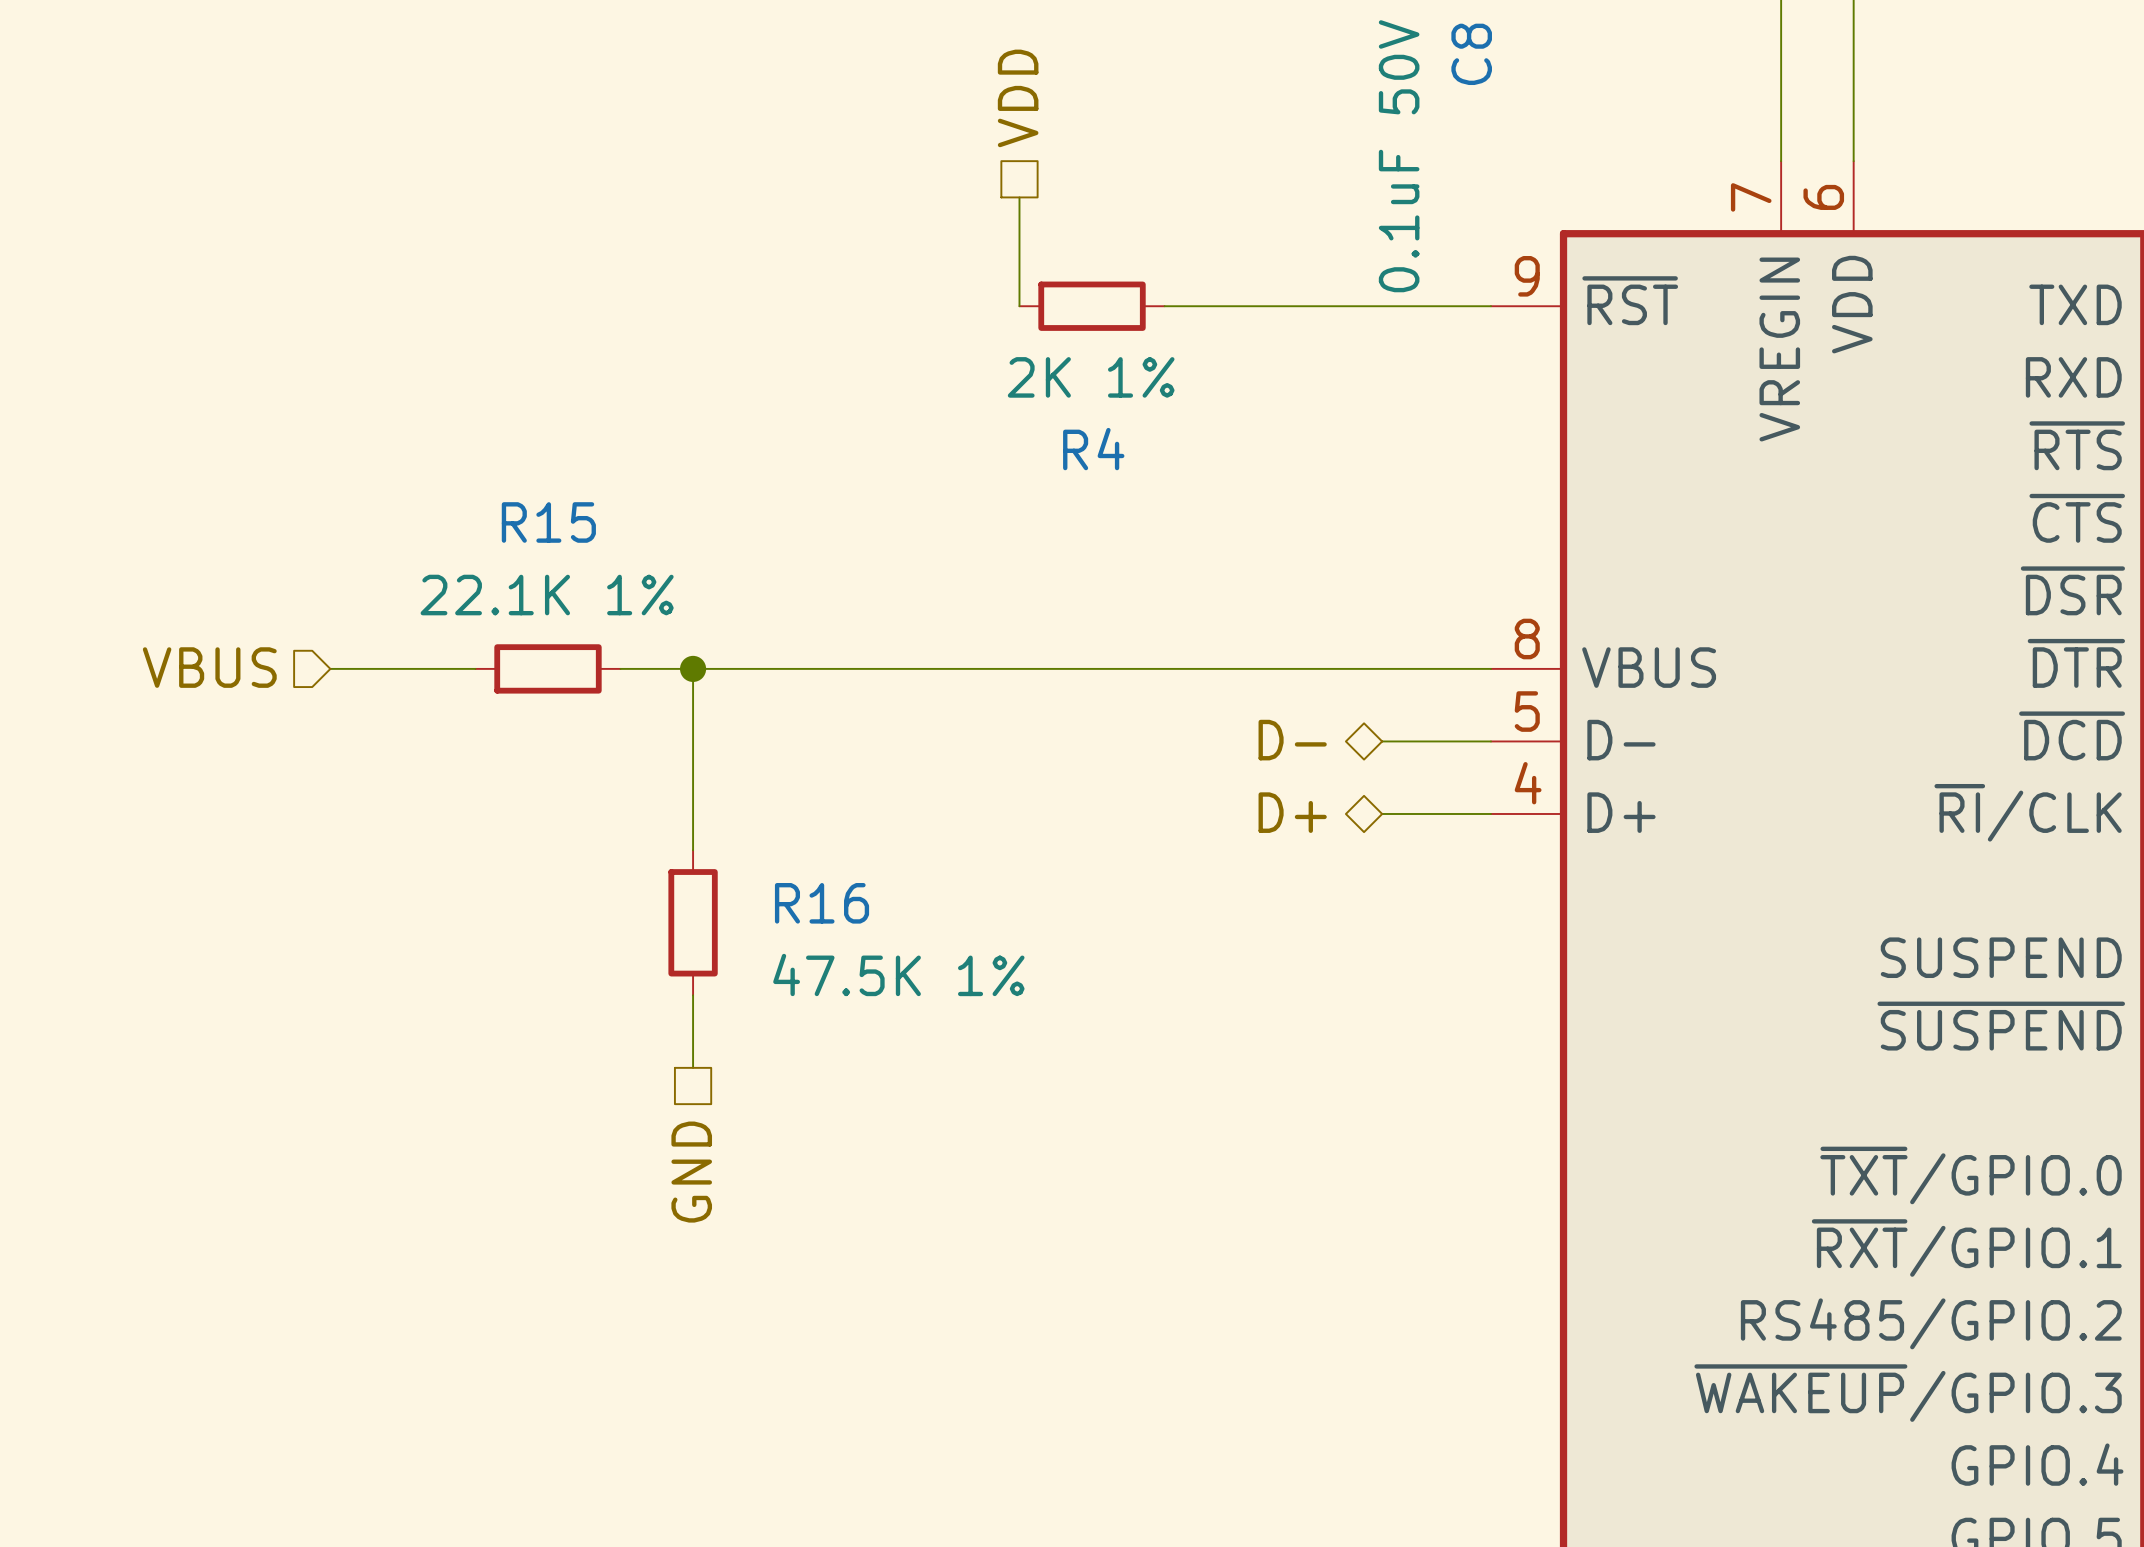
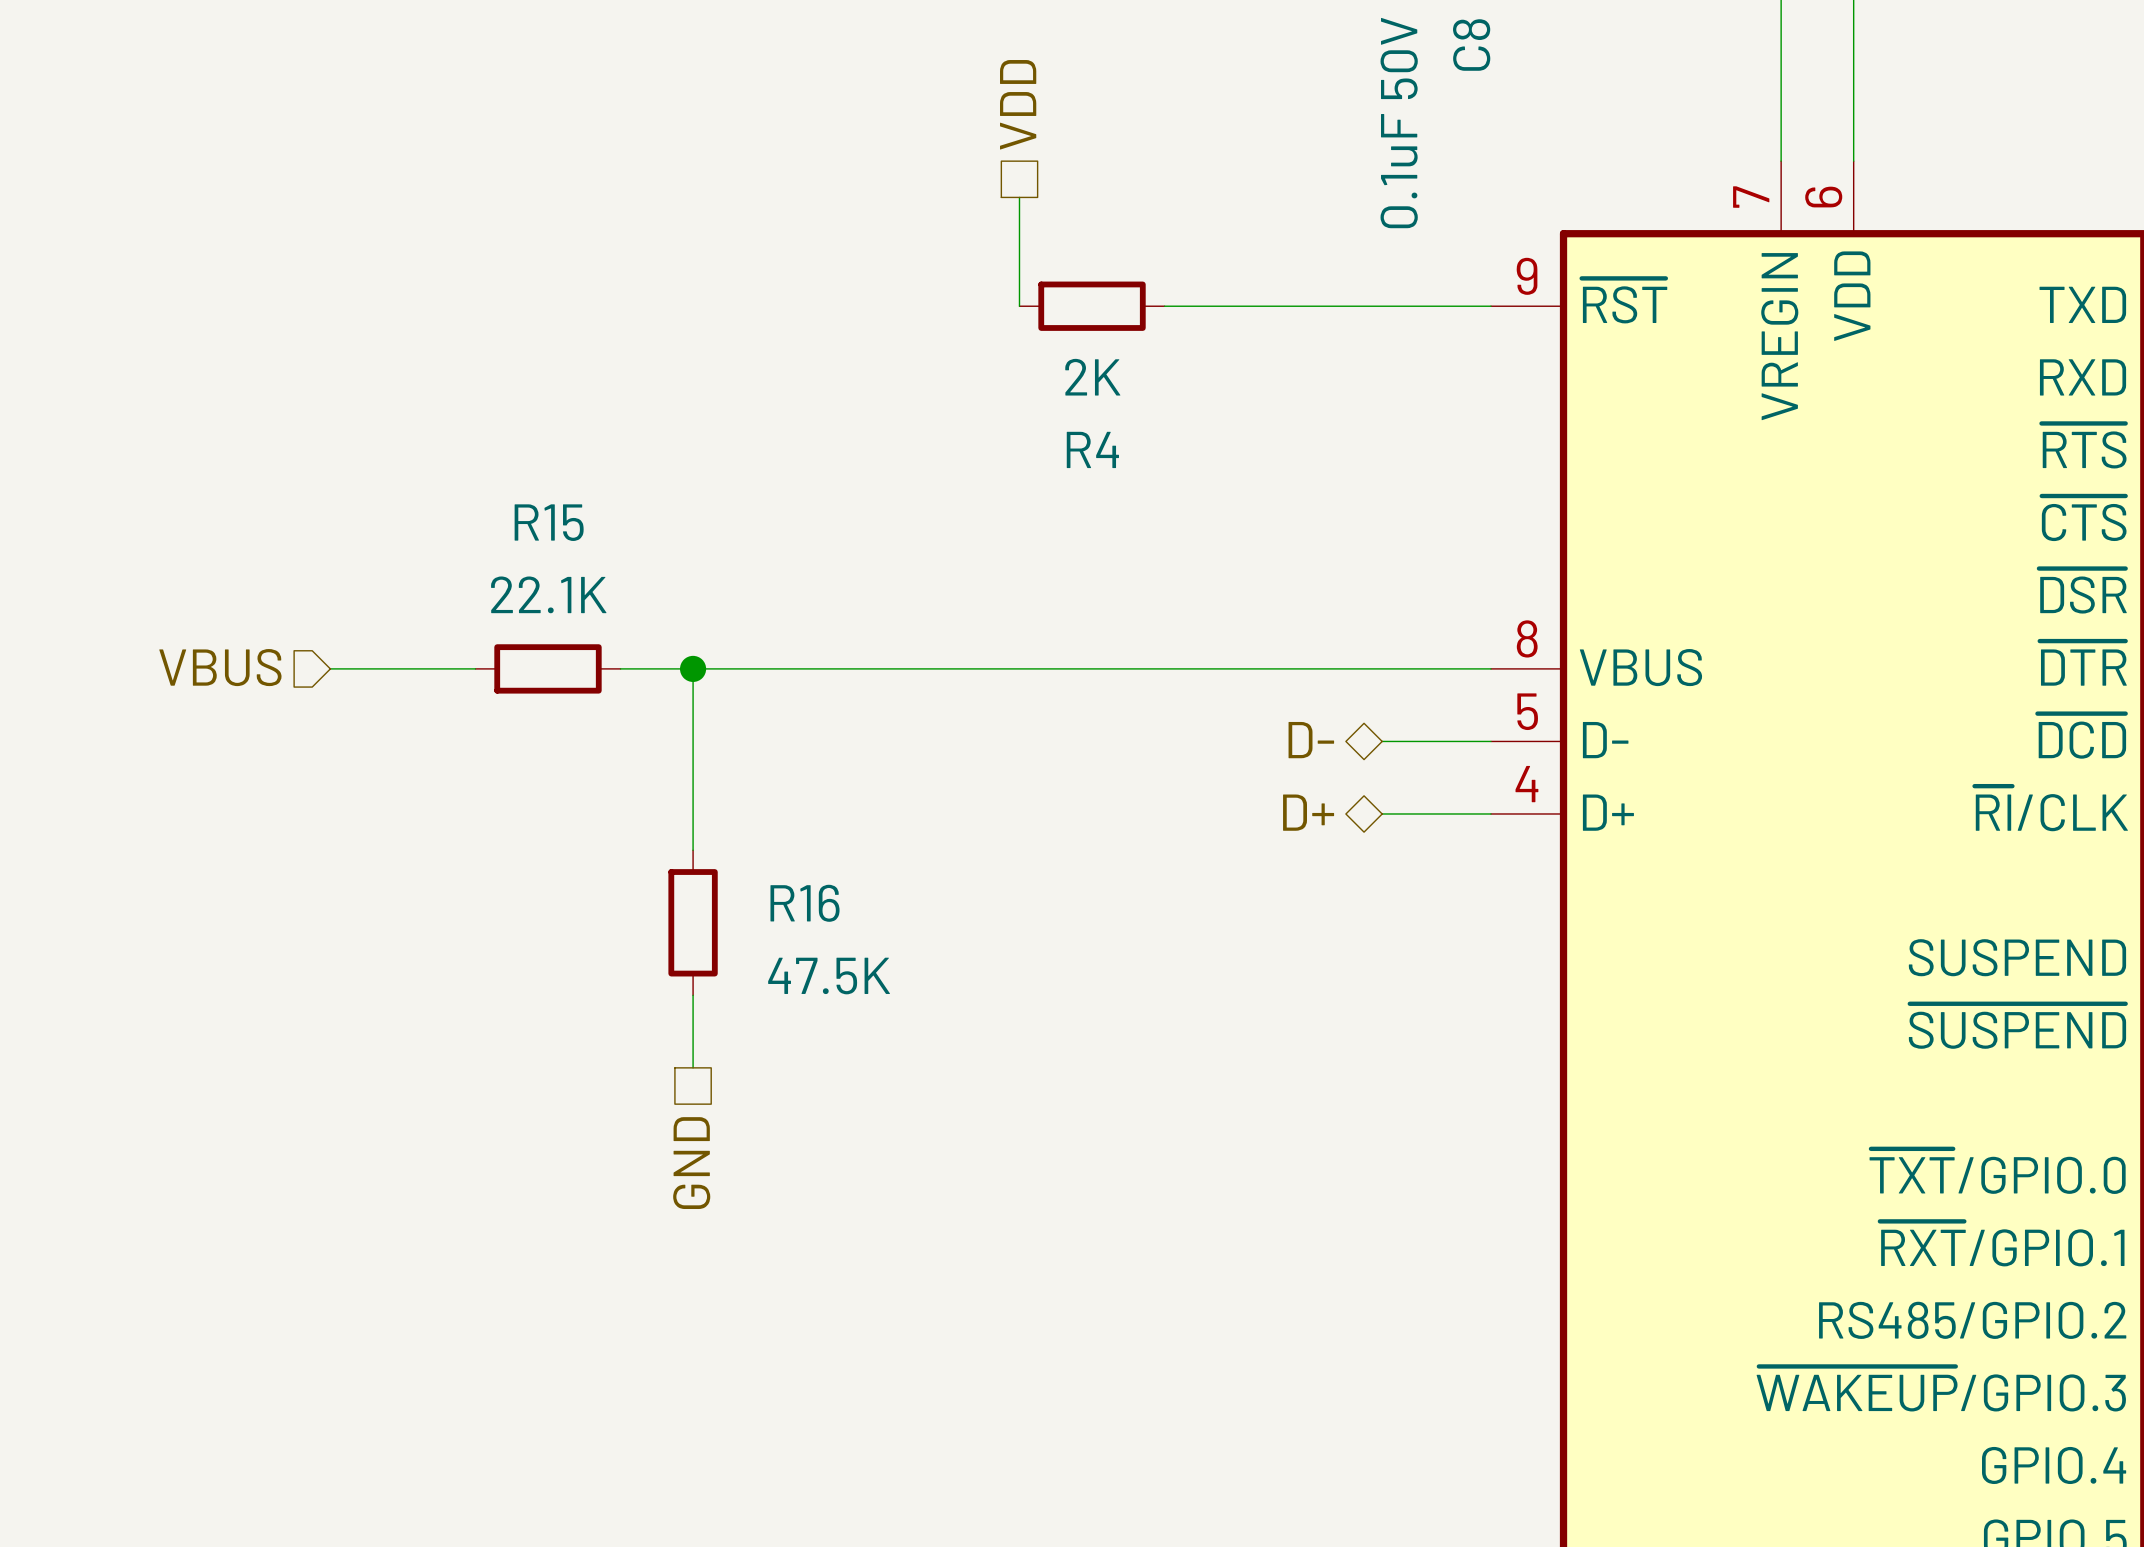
R4 value: 2K 1% (1091, 377) -> 2K (1092, 377)
R15 value: 22.1K 1% (547, 595) -> 22.1K (548, 594)
R16 value: 47.5K 1% (898, 974) -> 47.5K (829, 976)

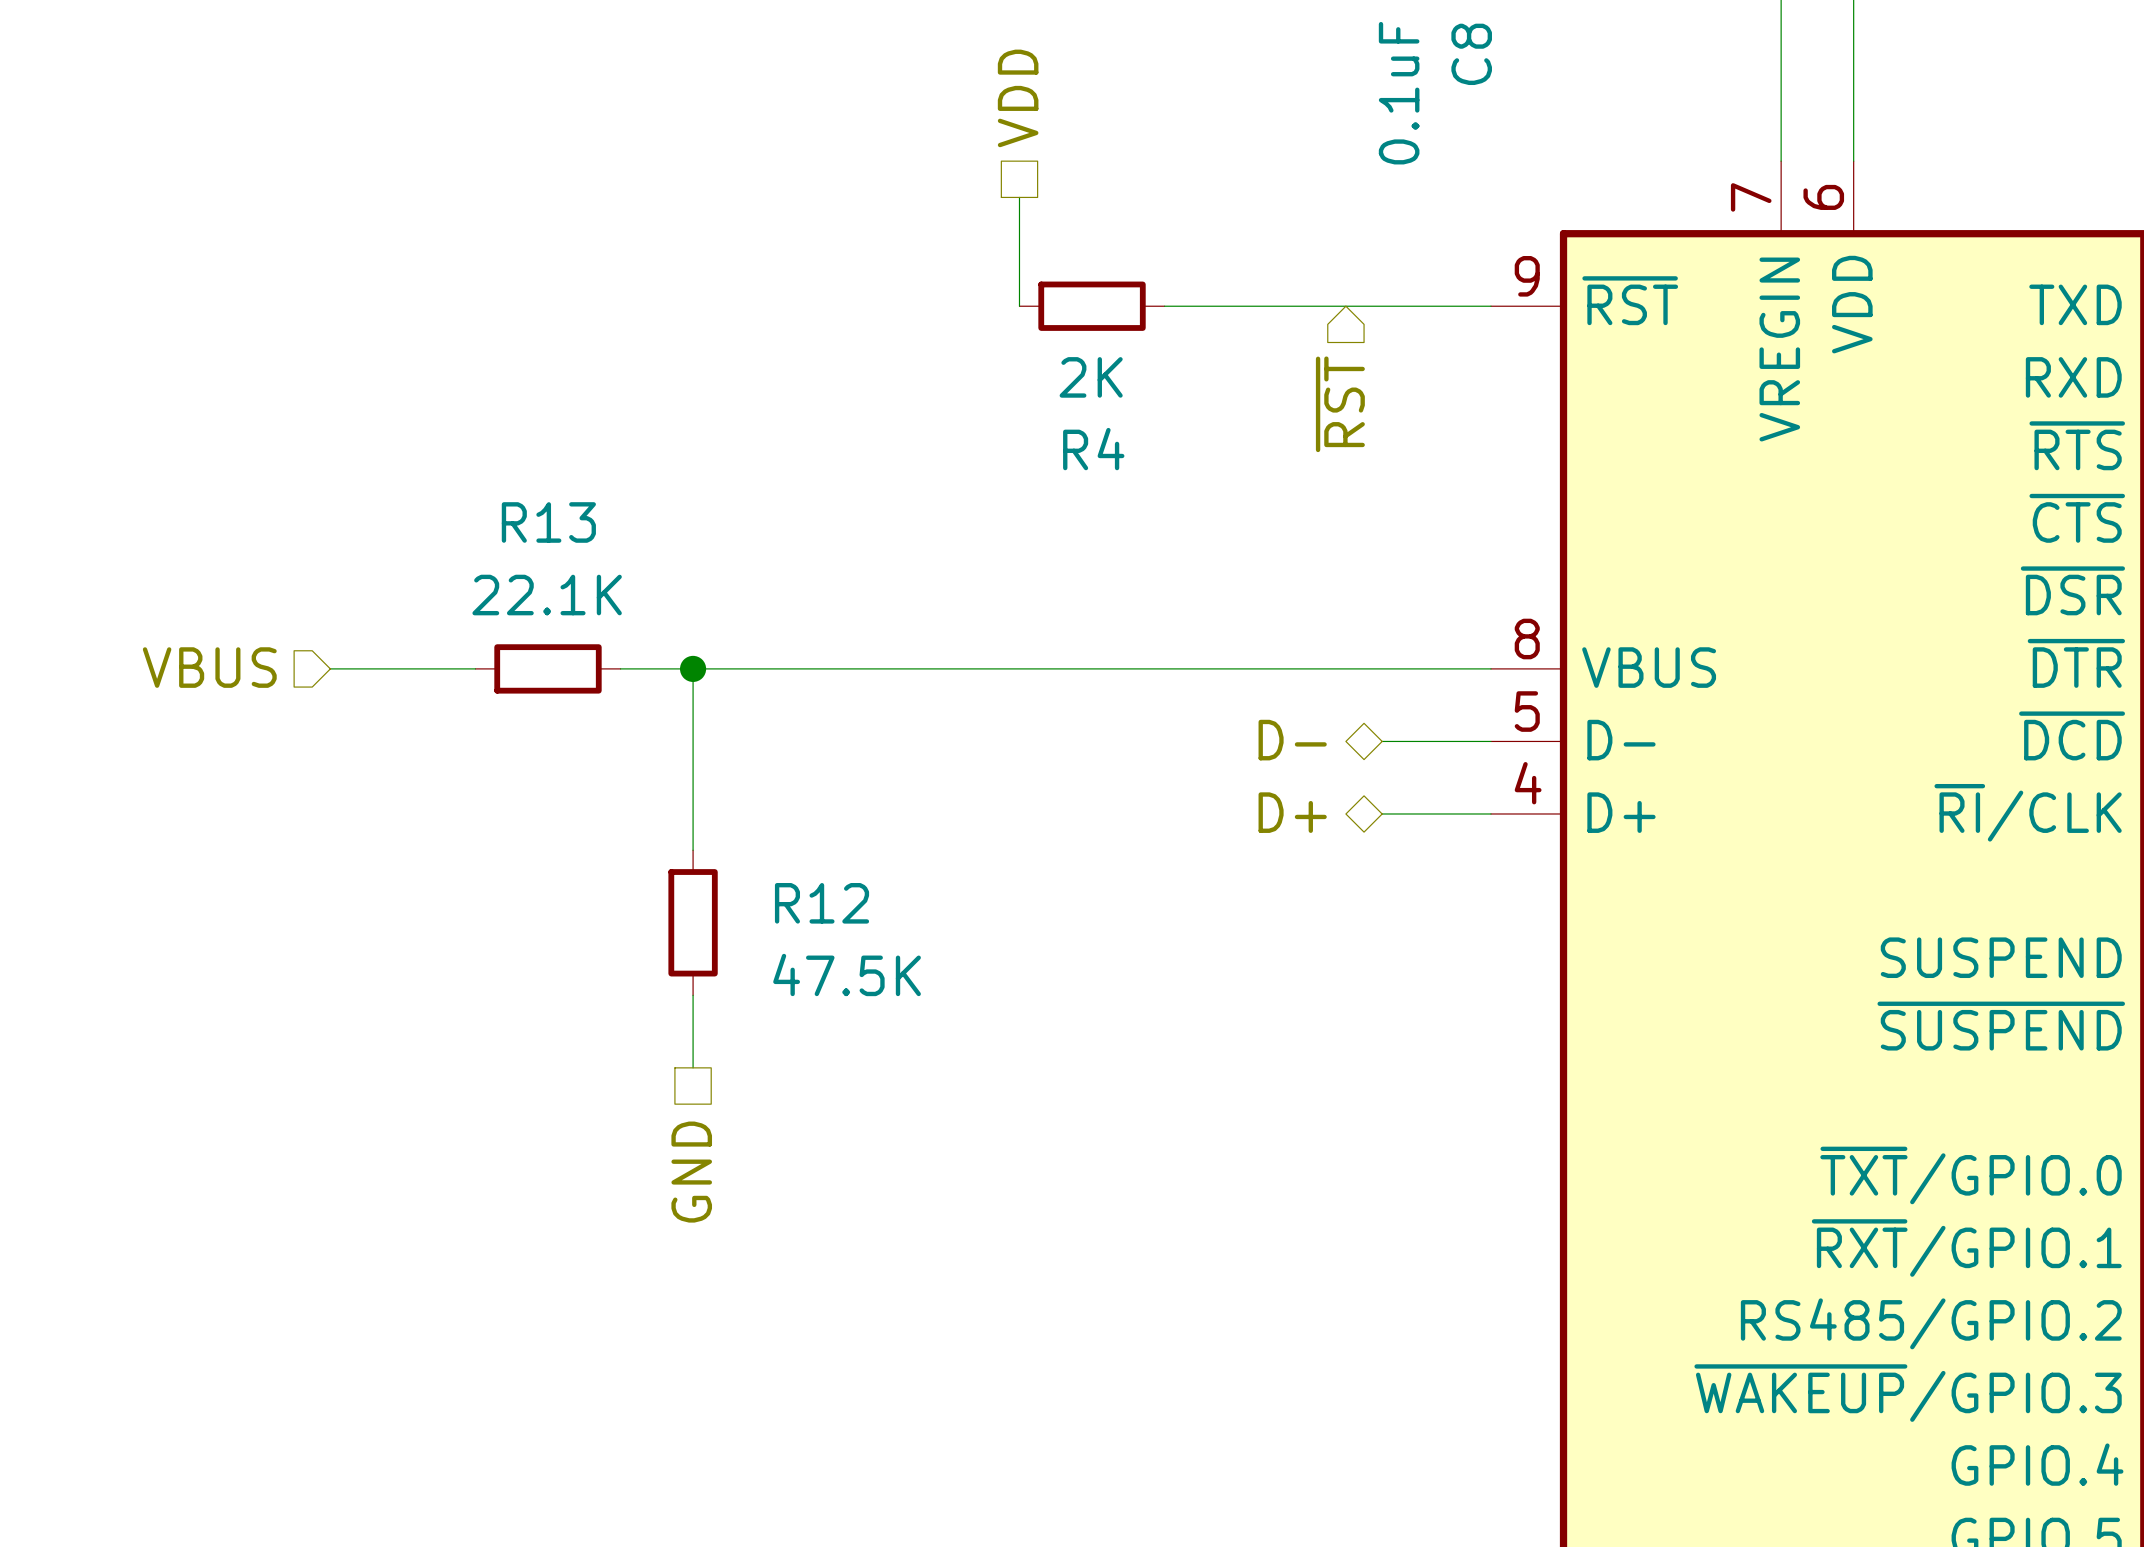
C8 value: 0.1uF 50V (1399, 122) -> 0.1uF (1399, 93)
hierarchical label: none -> ~{RST} (1340, 404)
R15 name: R15 (549, 522) -> R13 (548, 522)
R16 name: R16 (805, 903) -> R12 (822, 903)

